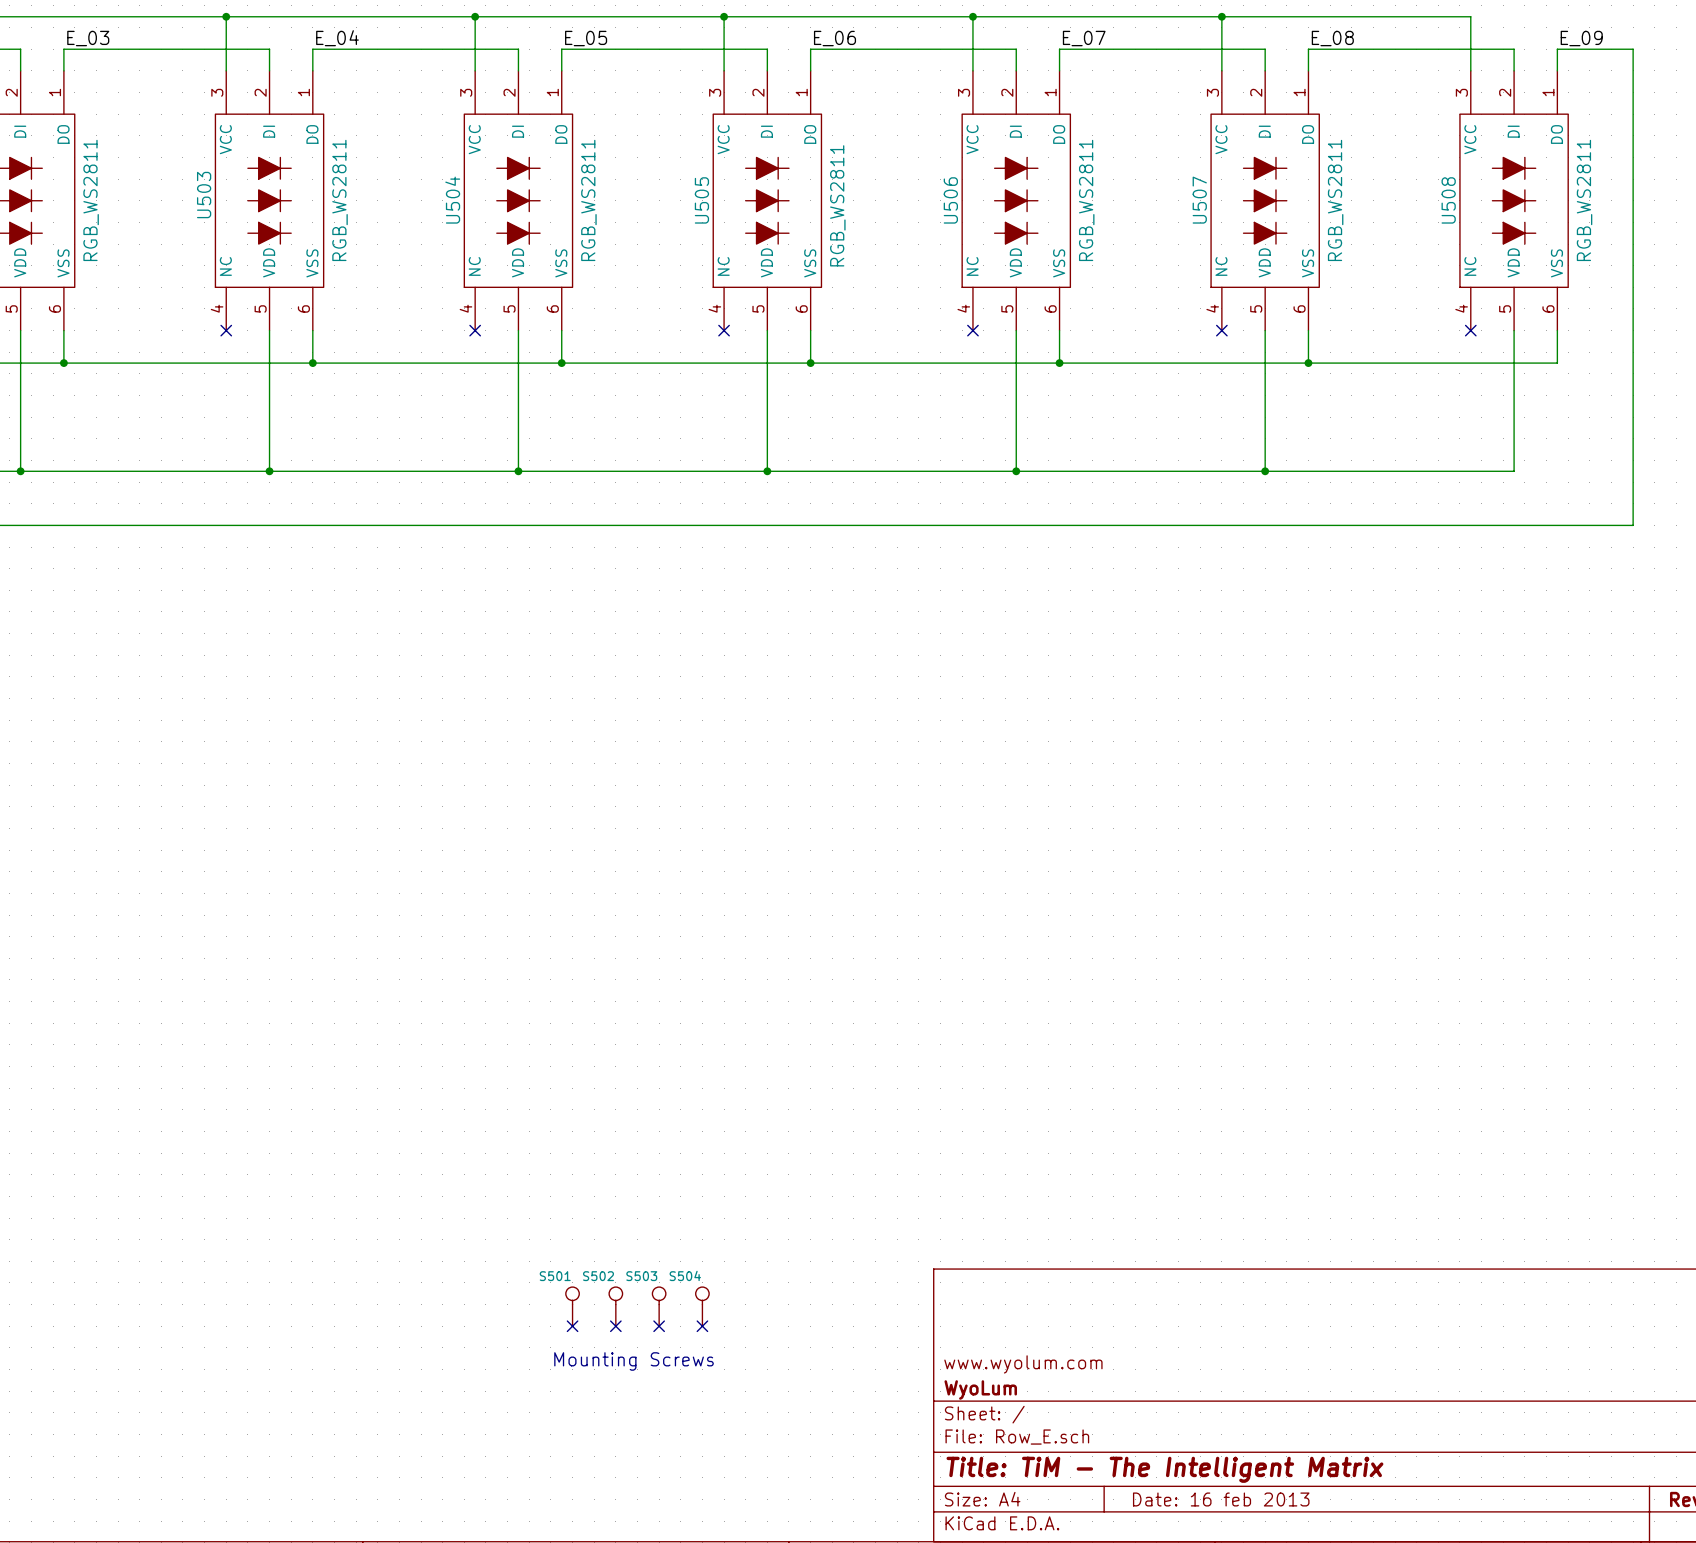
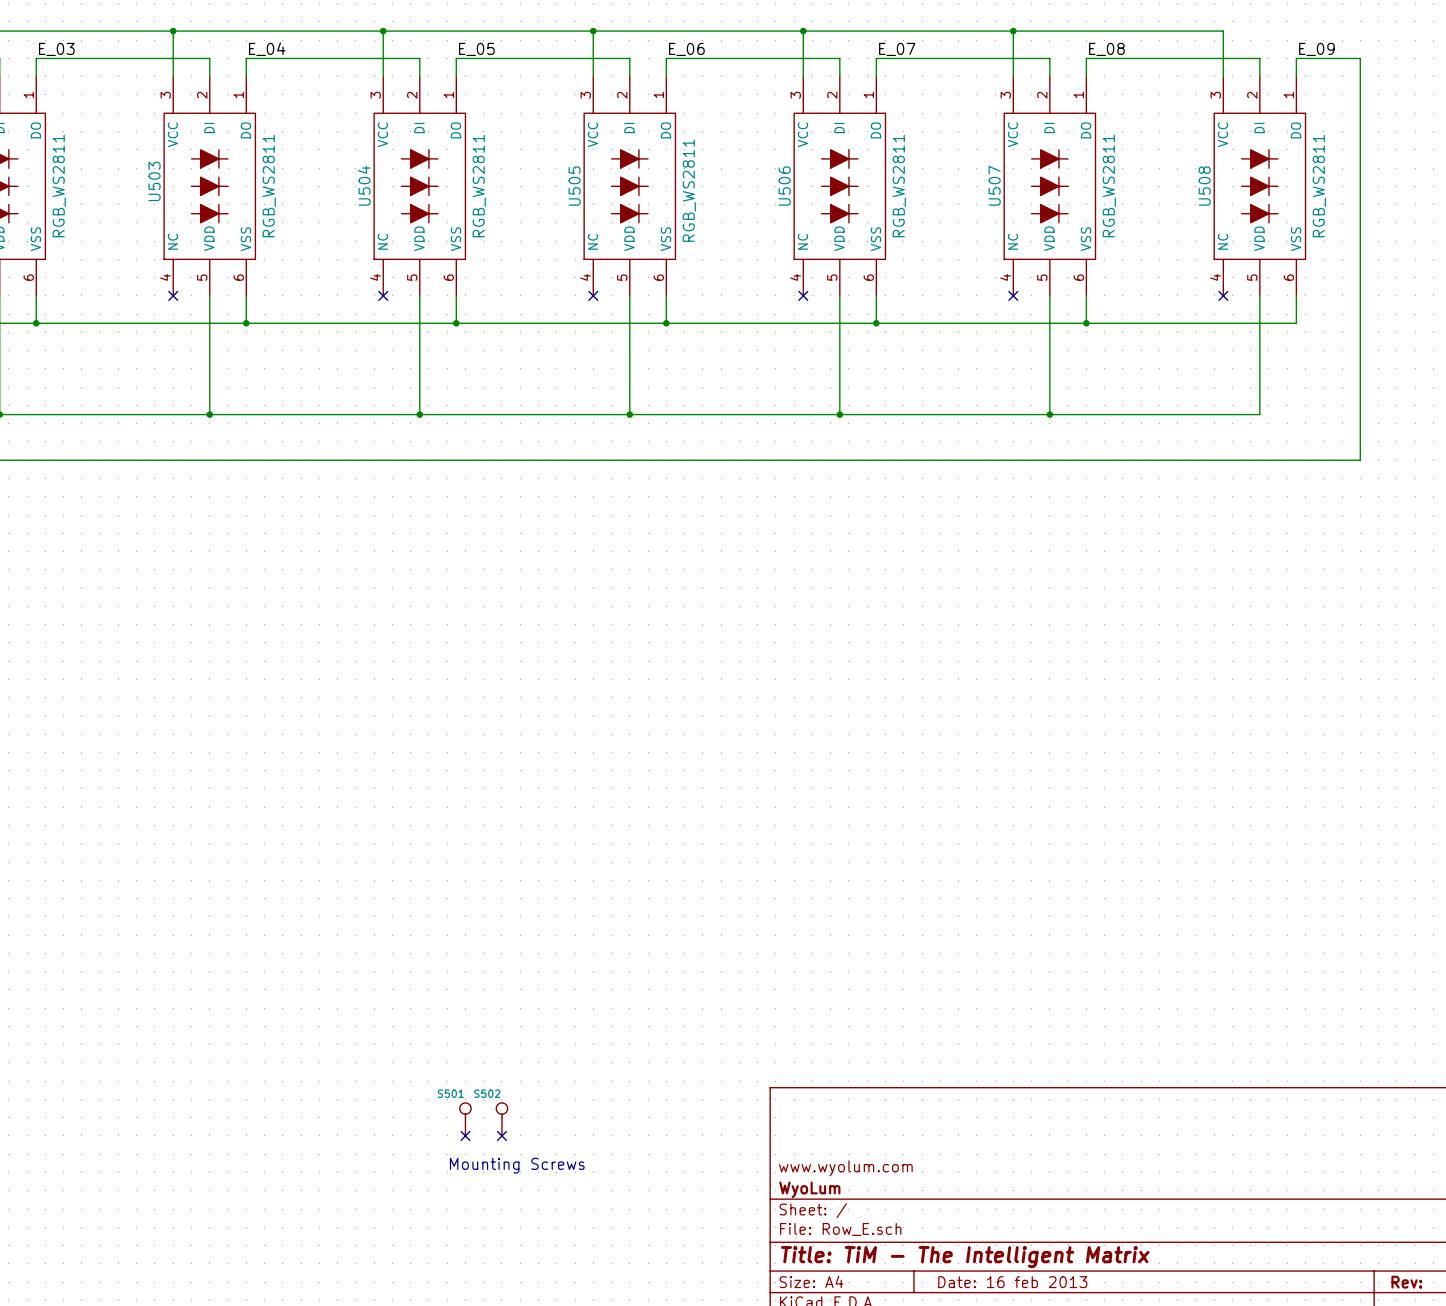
S503: (659, 1306) -> none
S504: (702, 1306) -> none
no-connect mark: (659, 1326) -> none
no-connect mark: (702, 1326) -> none

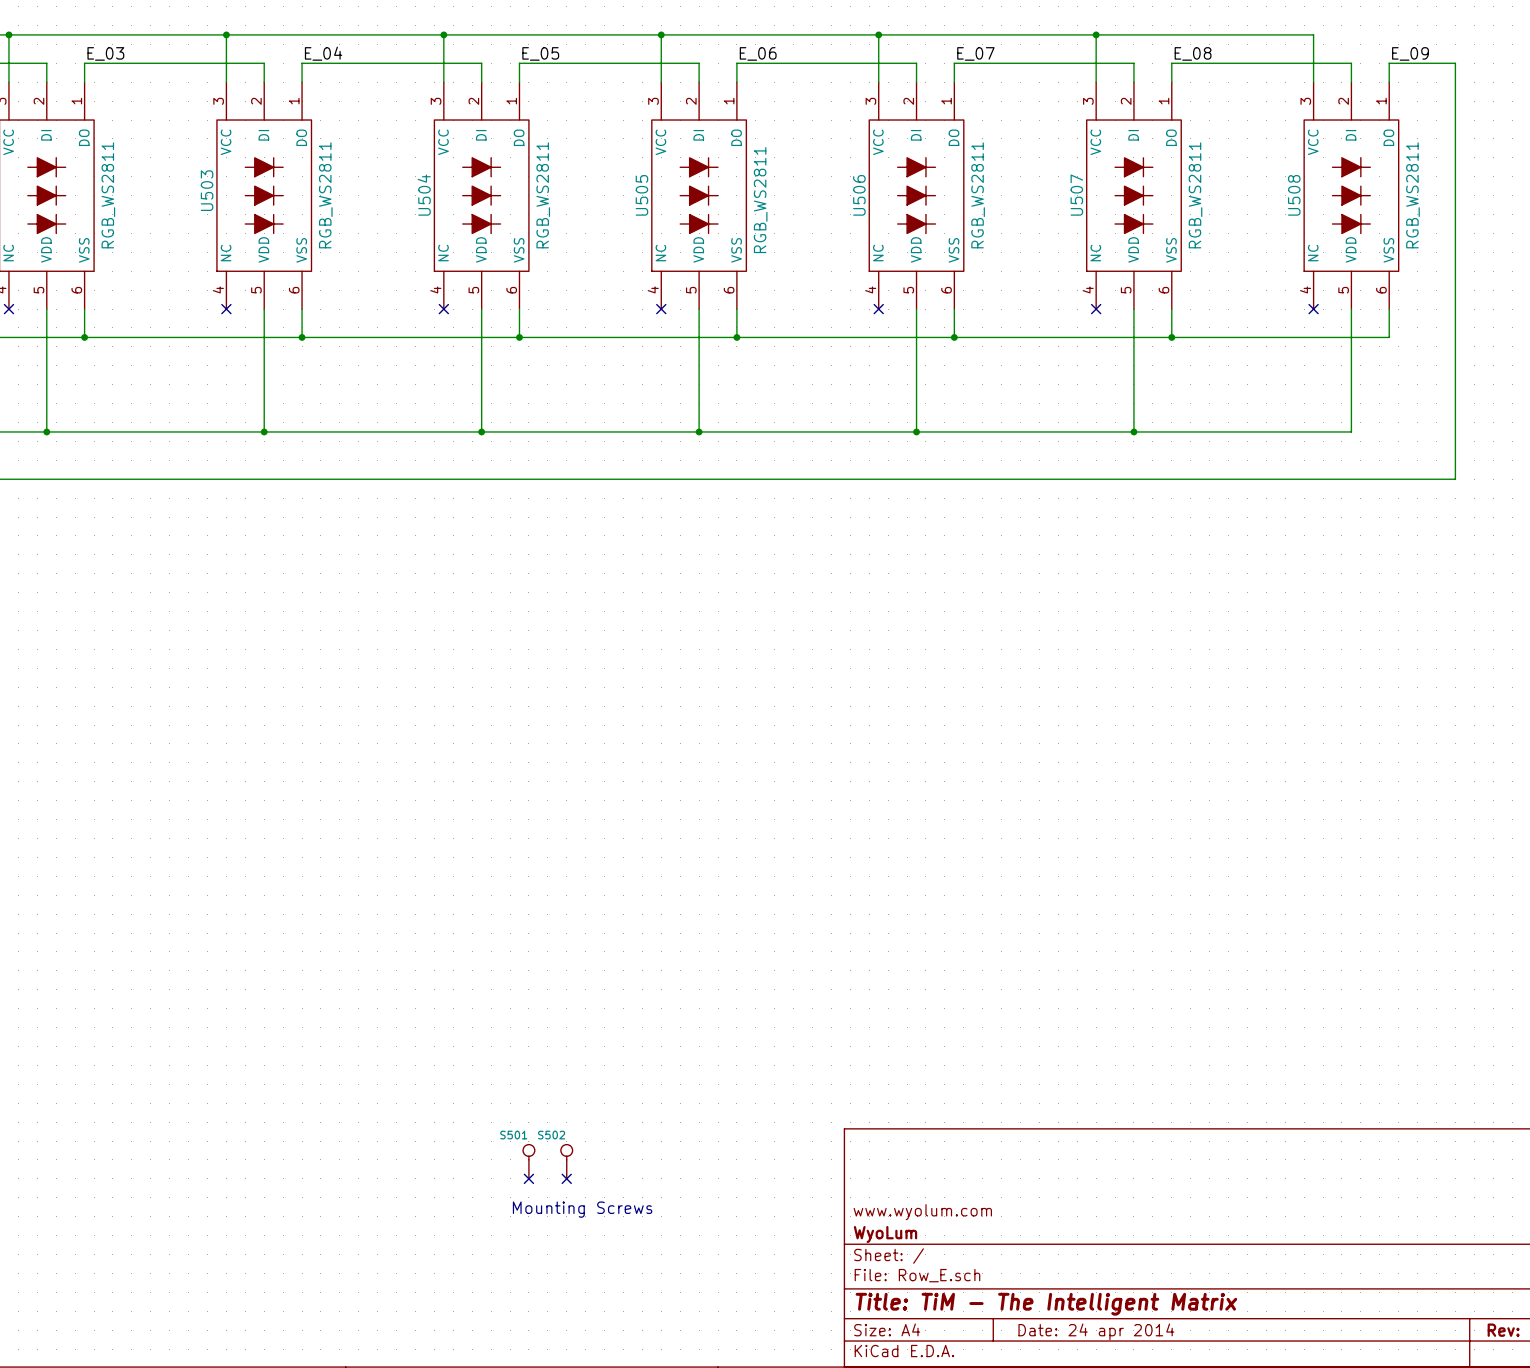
title block: Date: 16 feb 2013 (1012, 1282) -> Date: 24 apr 2014 (1096, 1331)

